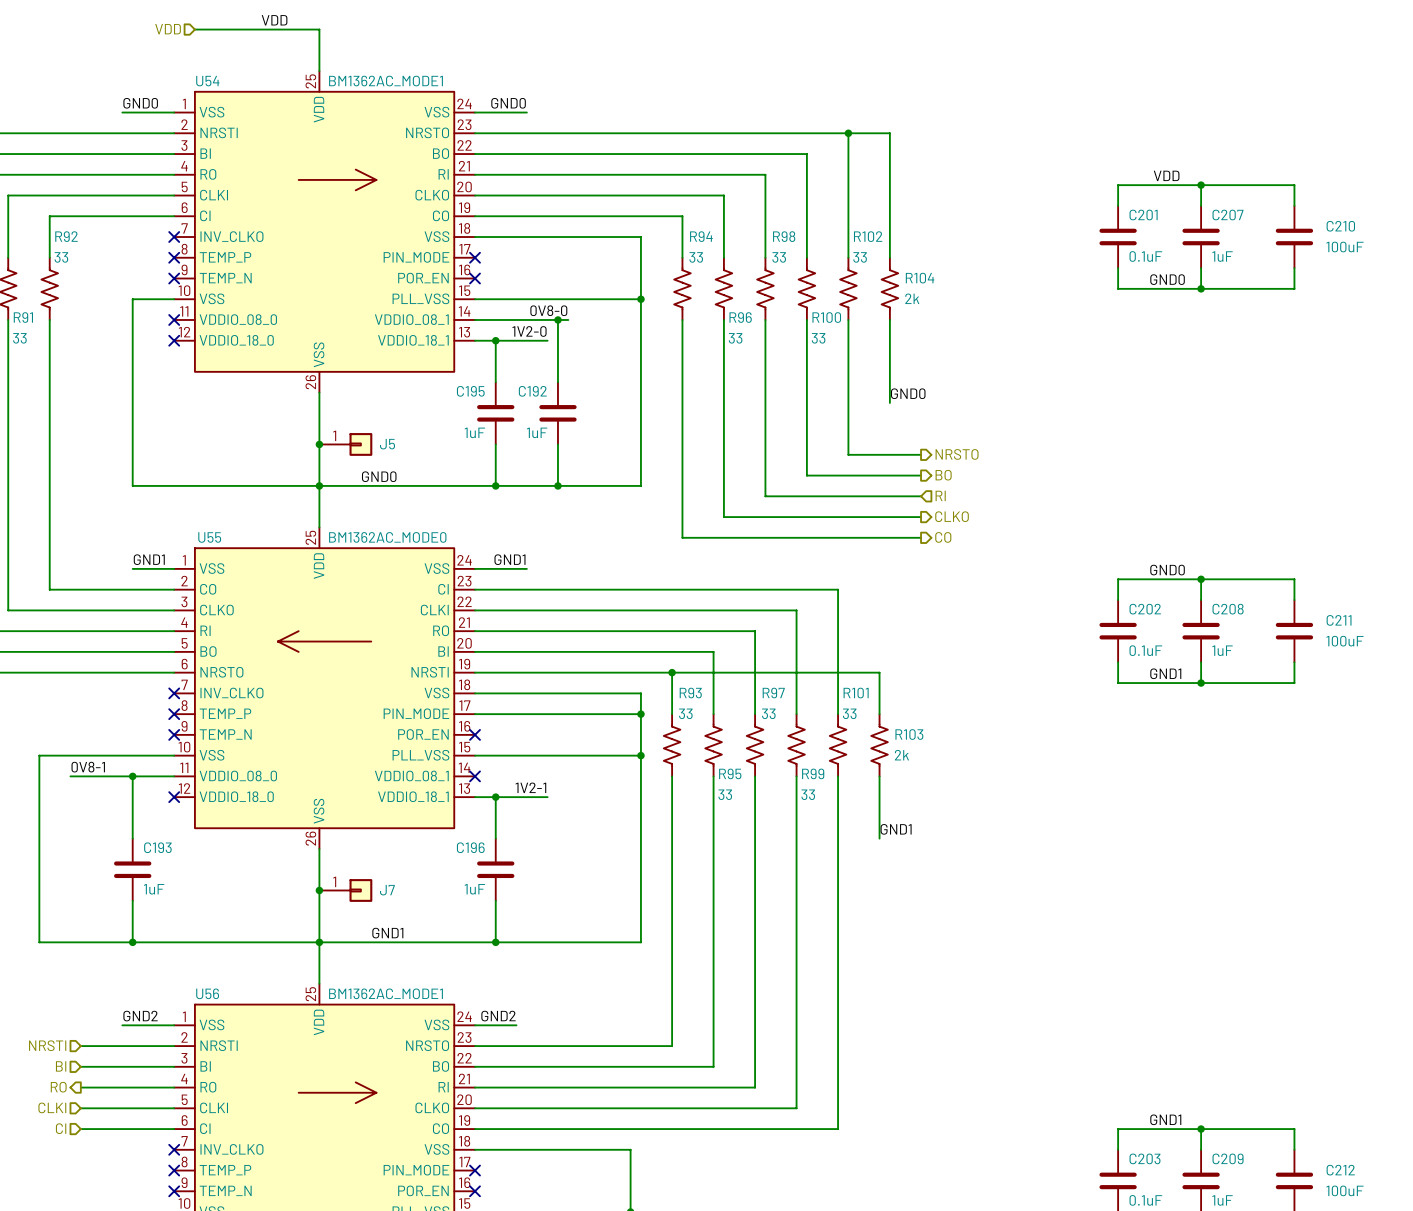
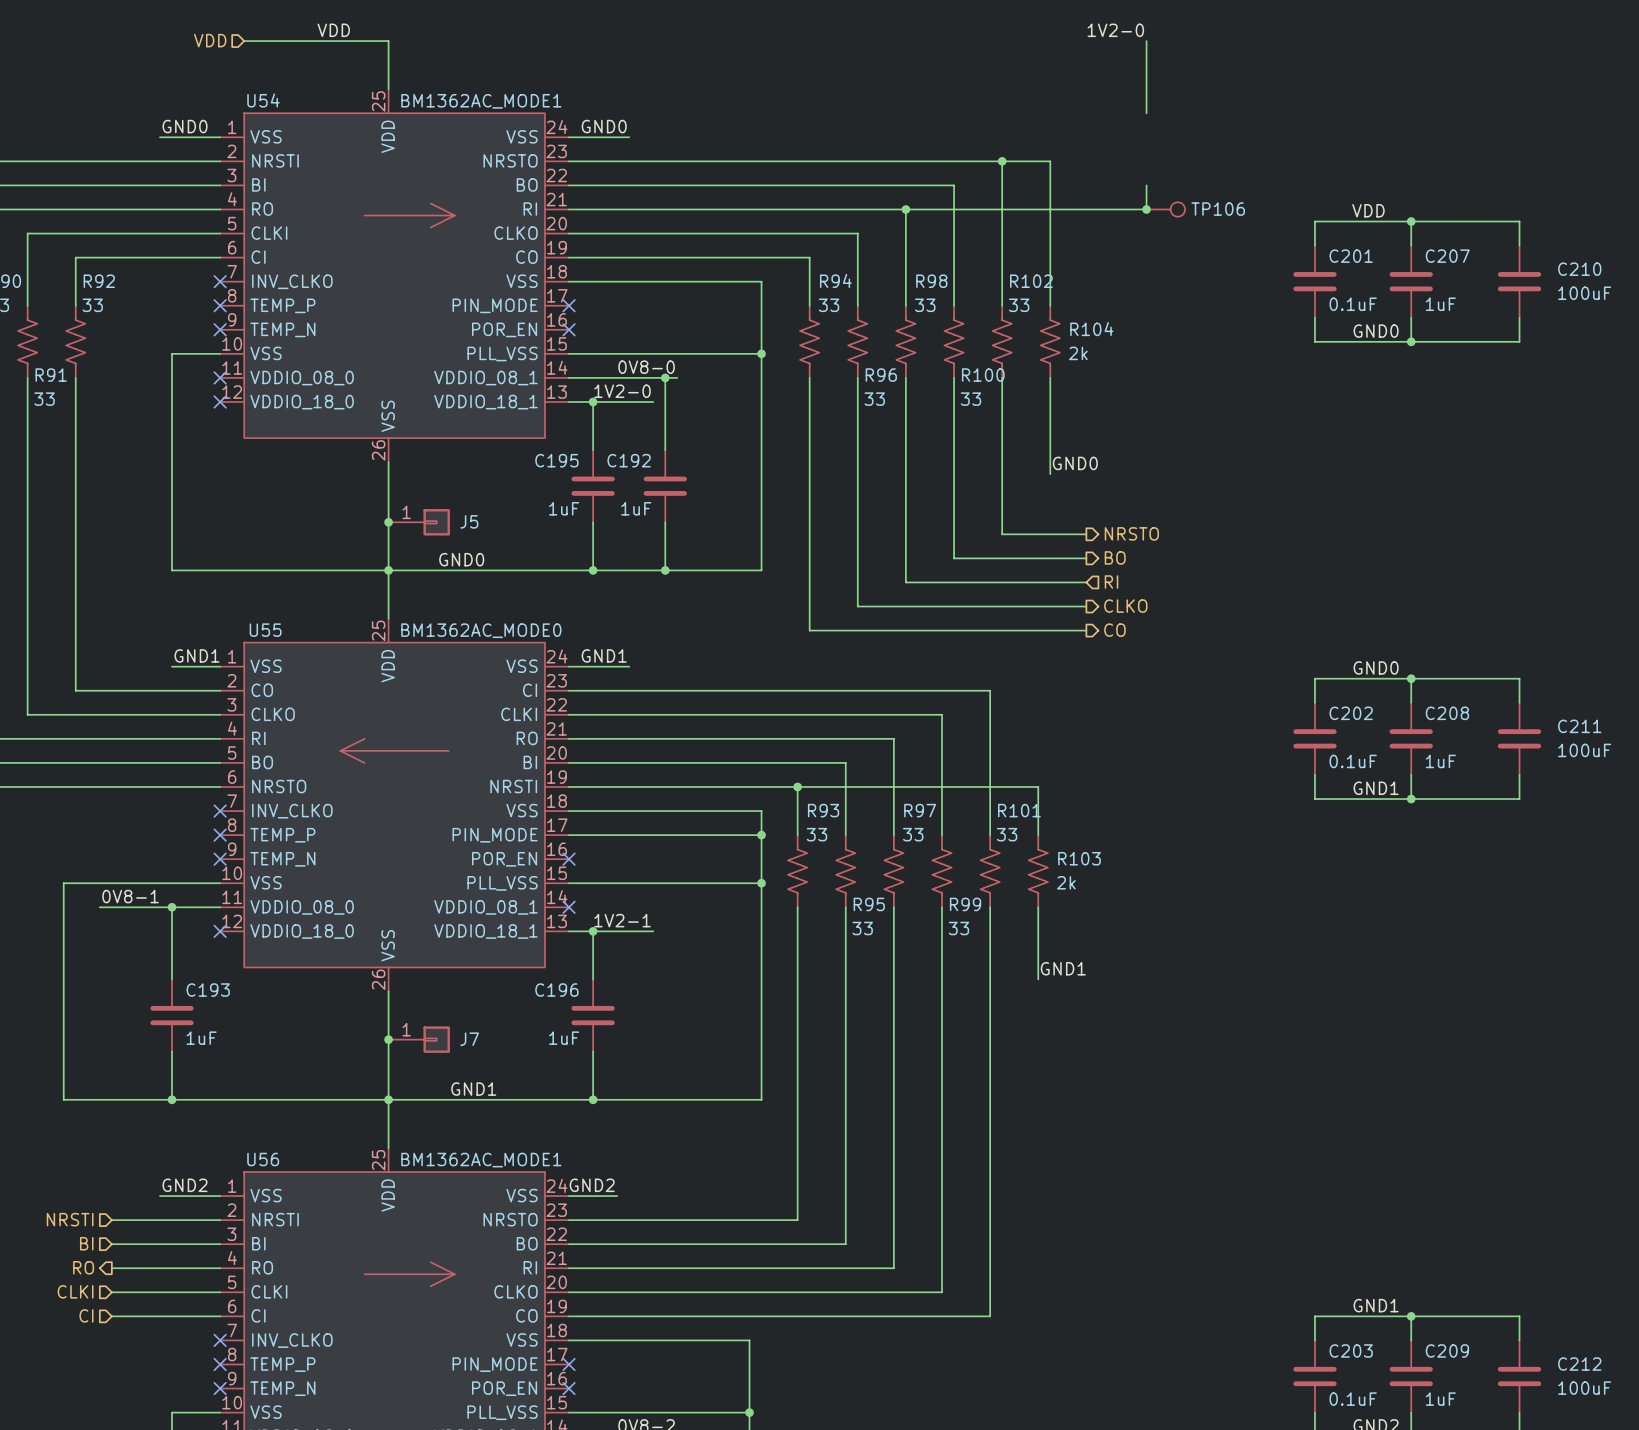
label: none -> 1V2-0 (1115, 30)
wire: none -> (1146, 41) (1146, 113)
wire: none -> (1146, 185) (1146, 209) (905, 209)
junction: none -> (905, 209)
junction: none -> (1146, 209)
TP106: none -> (1165, 209)

